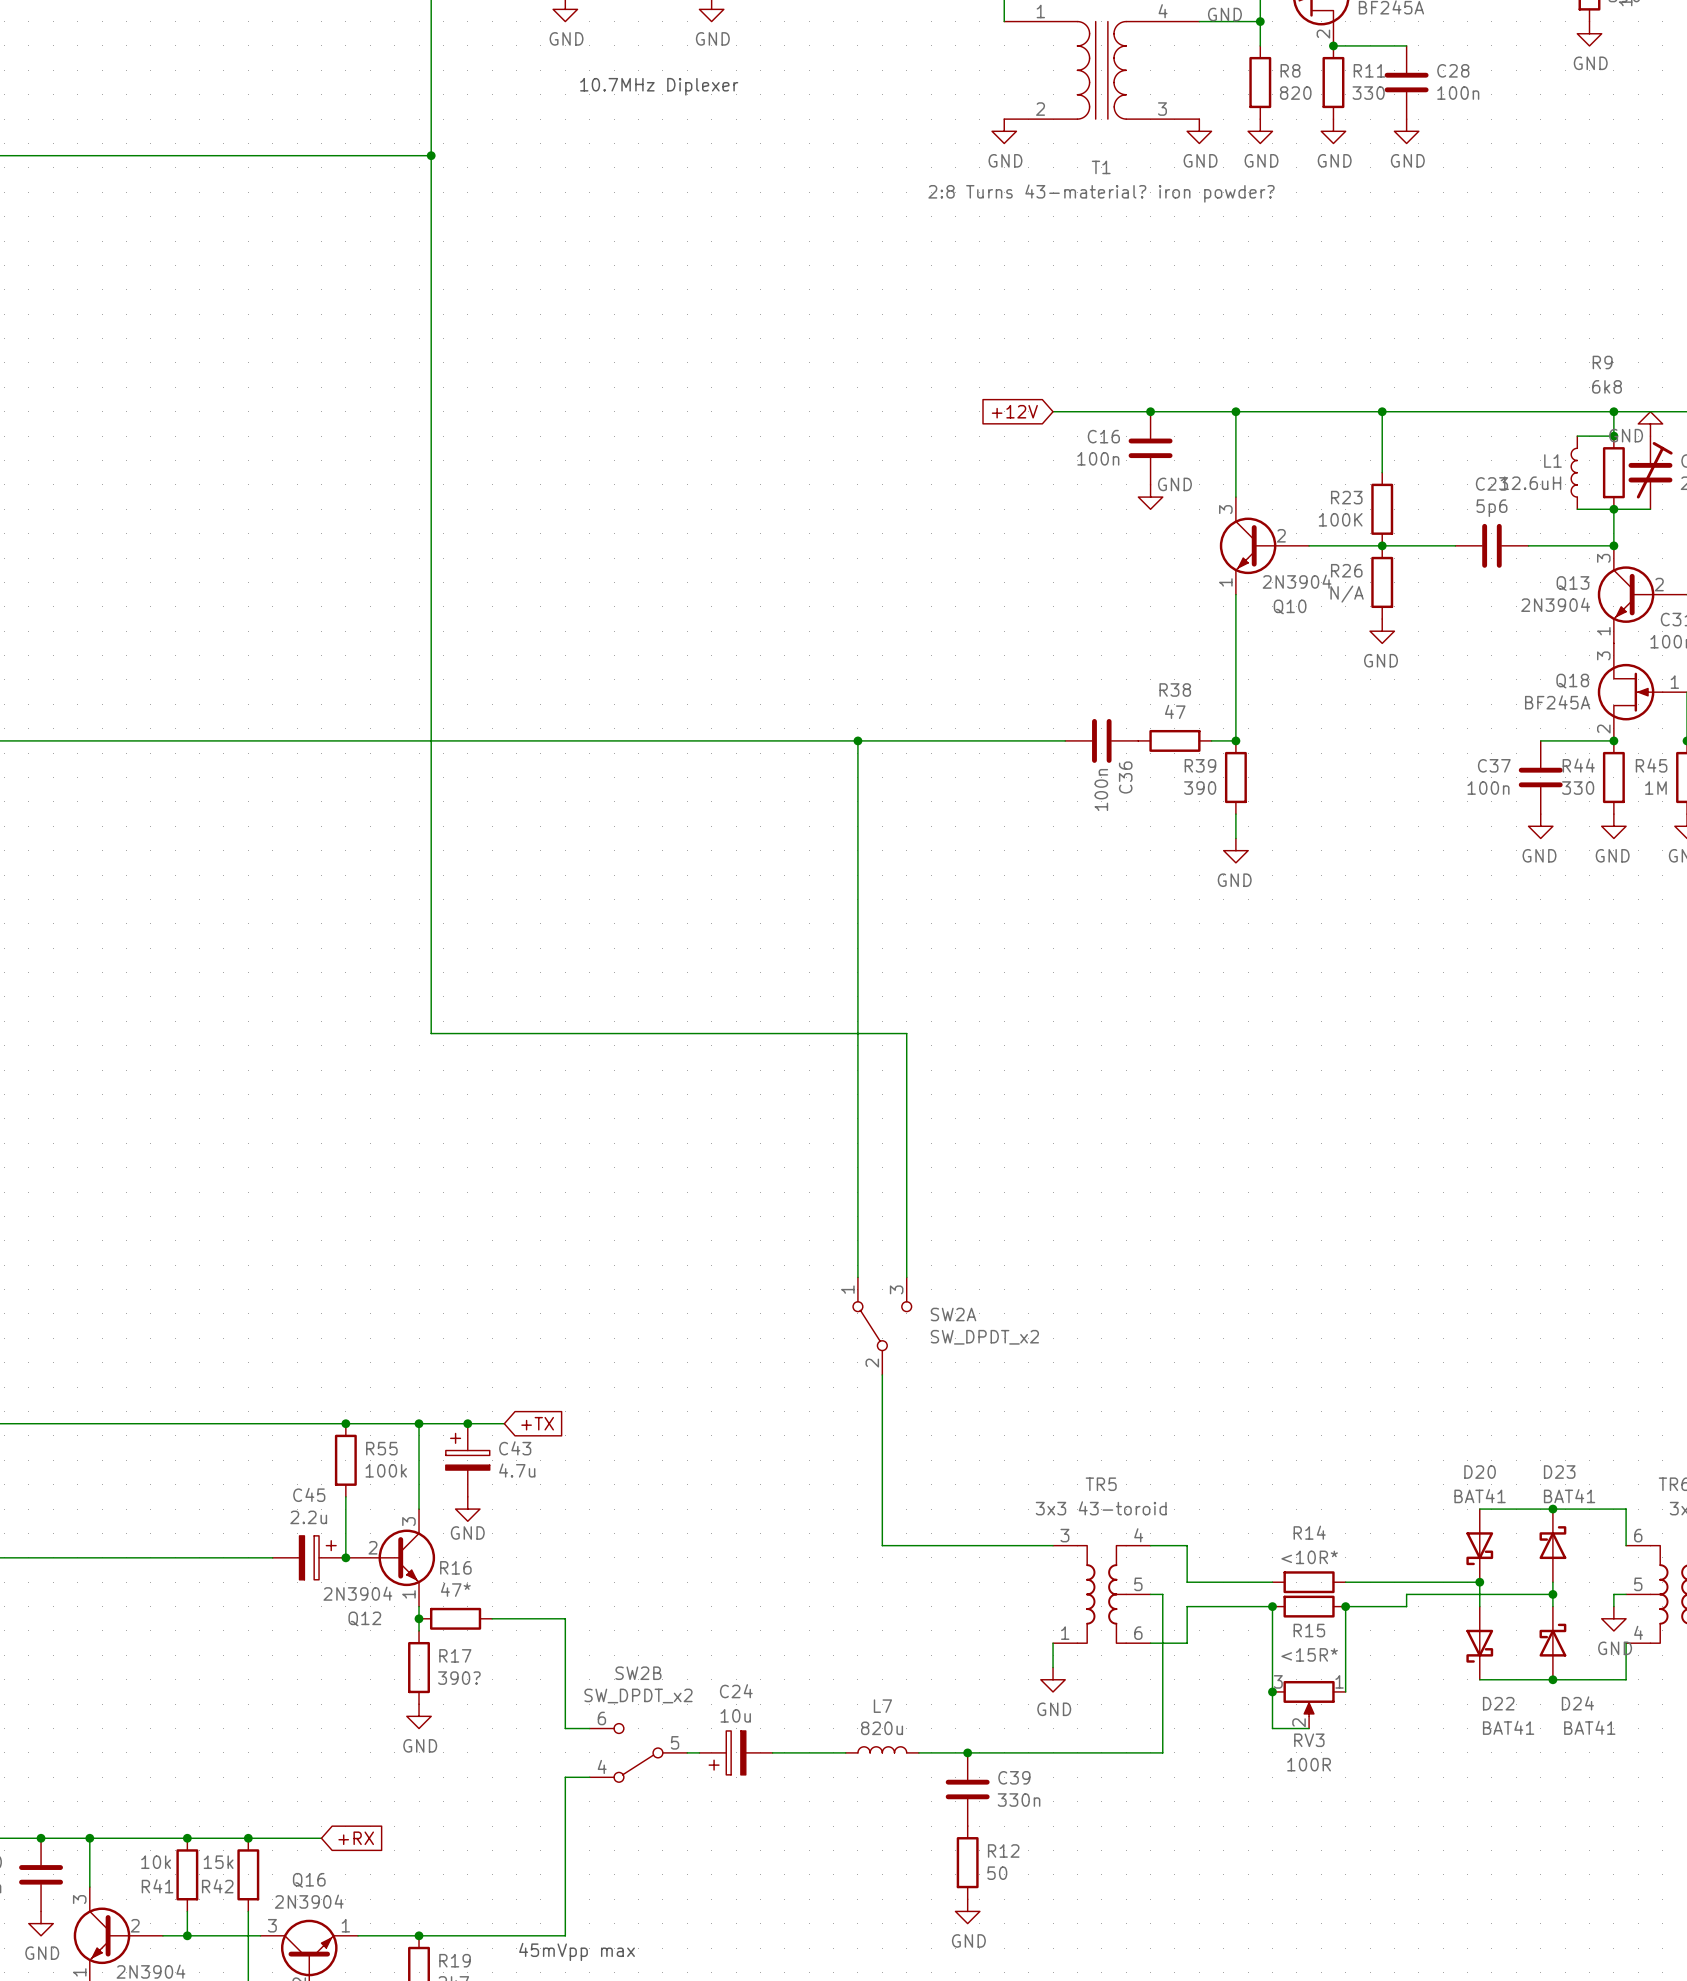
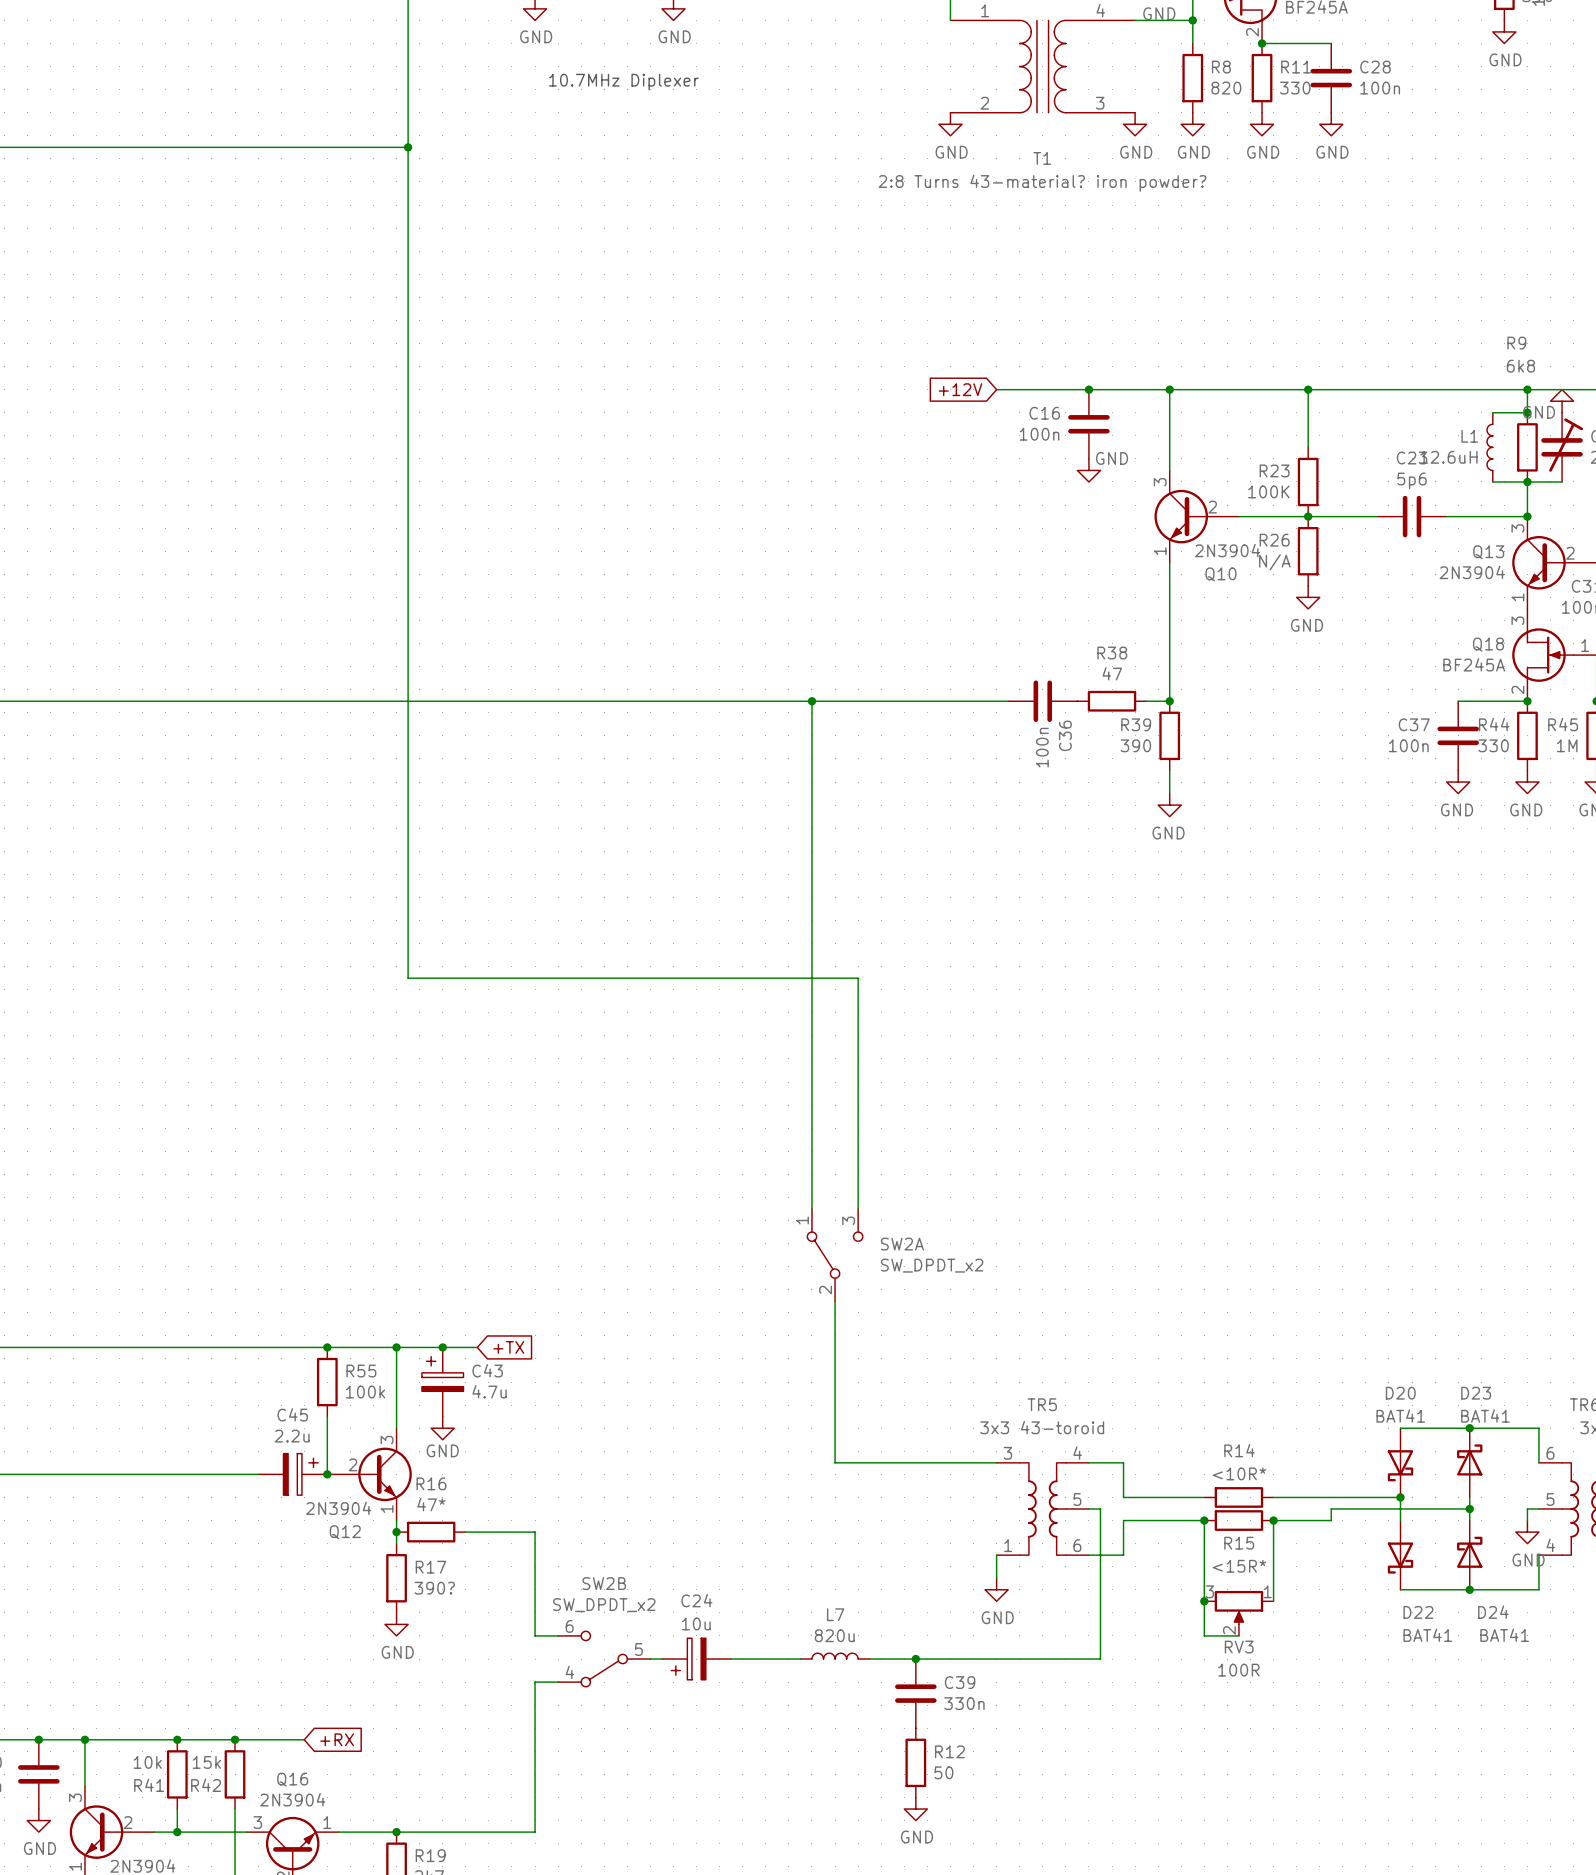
text: 45mVpp max (577, 1951) -> none

